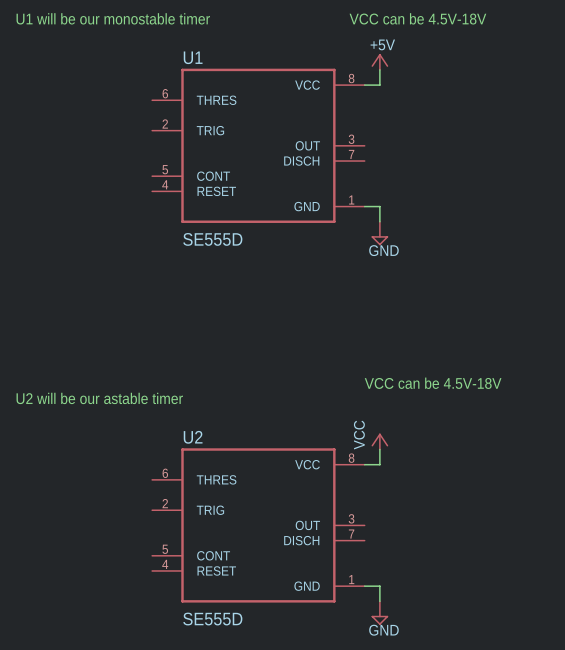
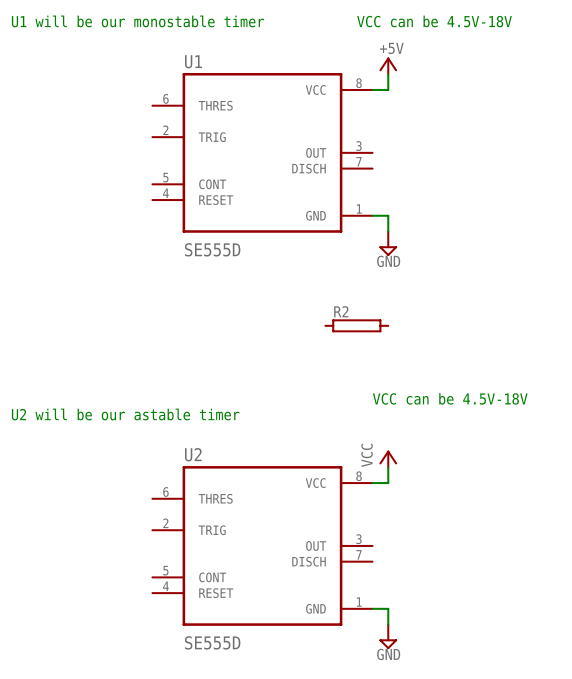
R2: none -> (356, 325)

